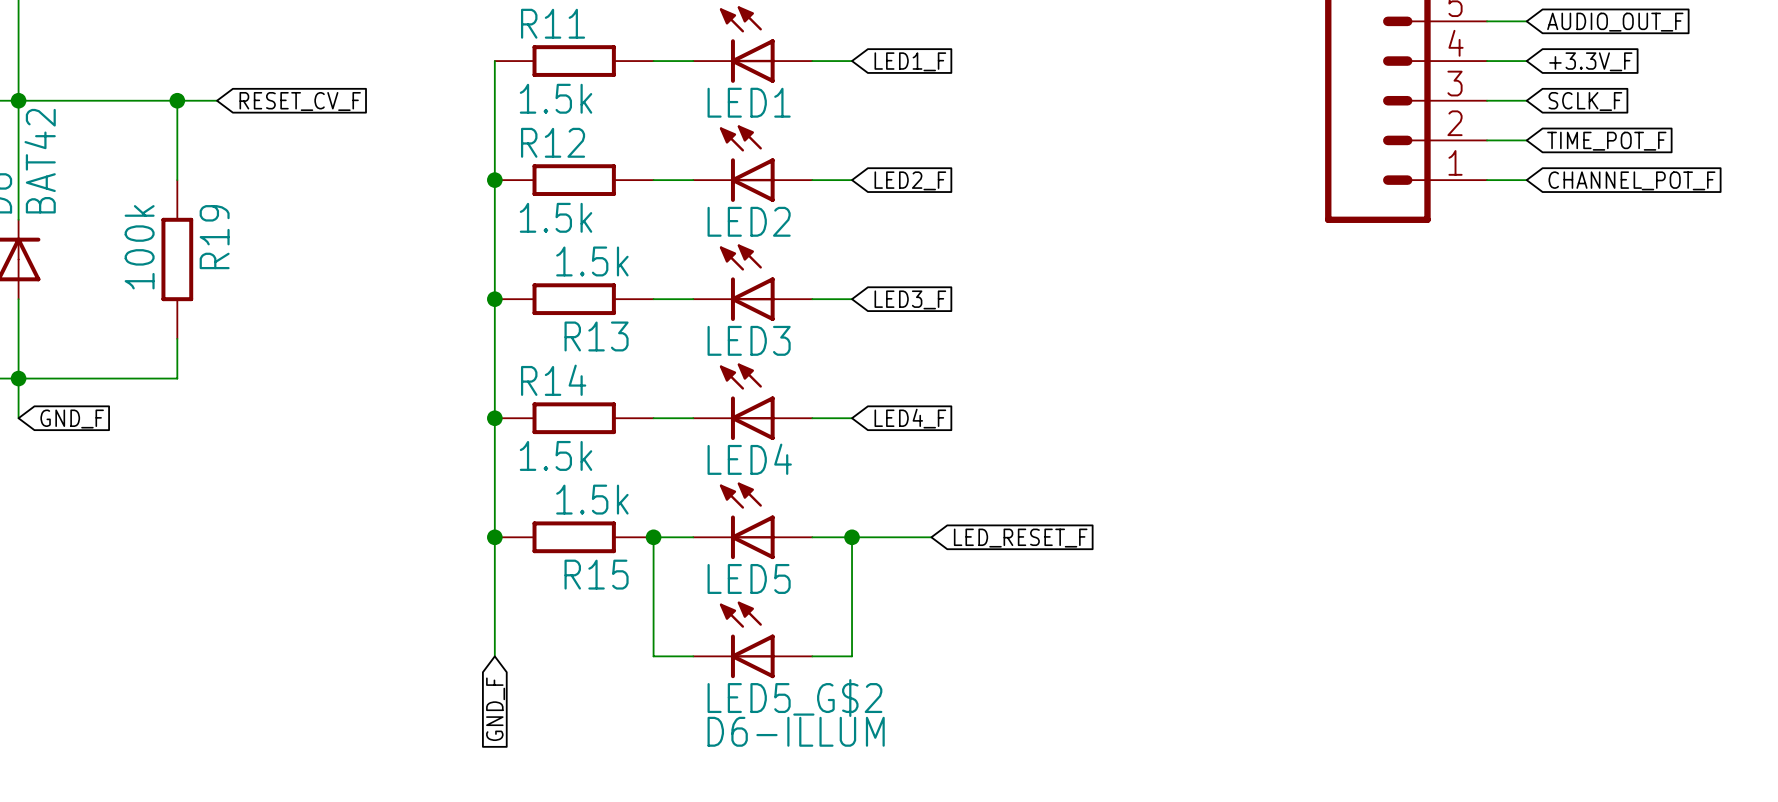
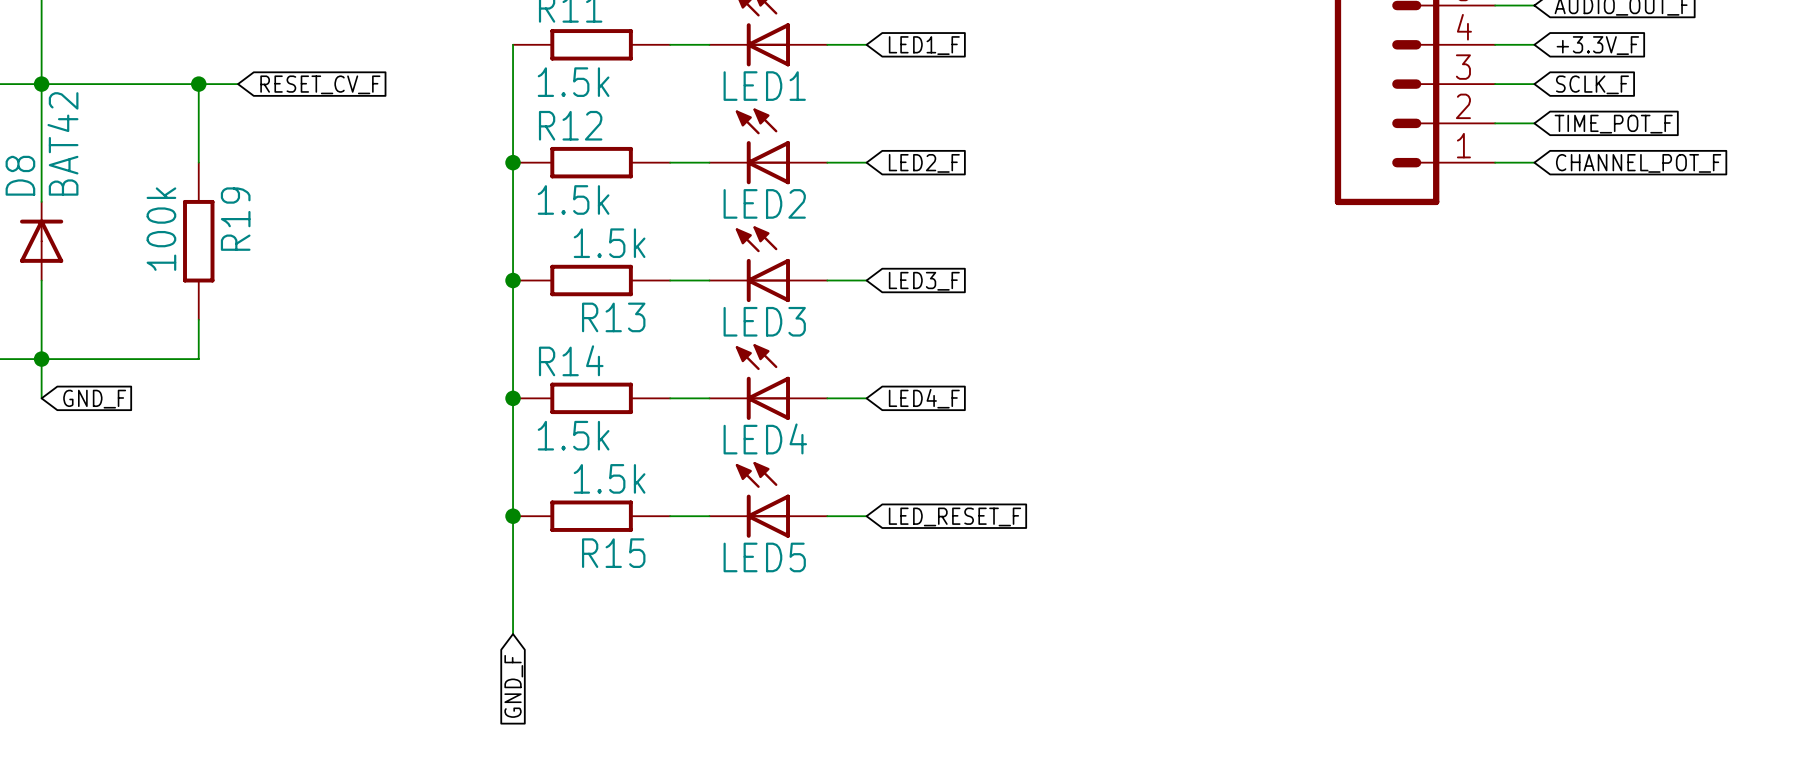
wire: (653, 537) (653, 656) (693, 656) -> none
junction: (653, 537) -> none
junction: (852, 537) -> none
wire: (931, 537) (852, 537) (852, 656) (812, 656) -> none
global label position: LED_RESET_F (1020, 538) -> LED_RESET_F (954, 516)
LED5_G$2: D6-ILLUM (752, 639) -> none

